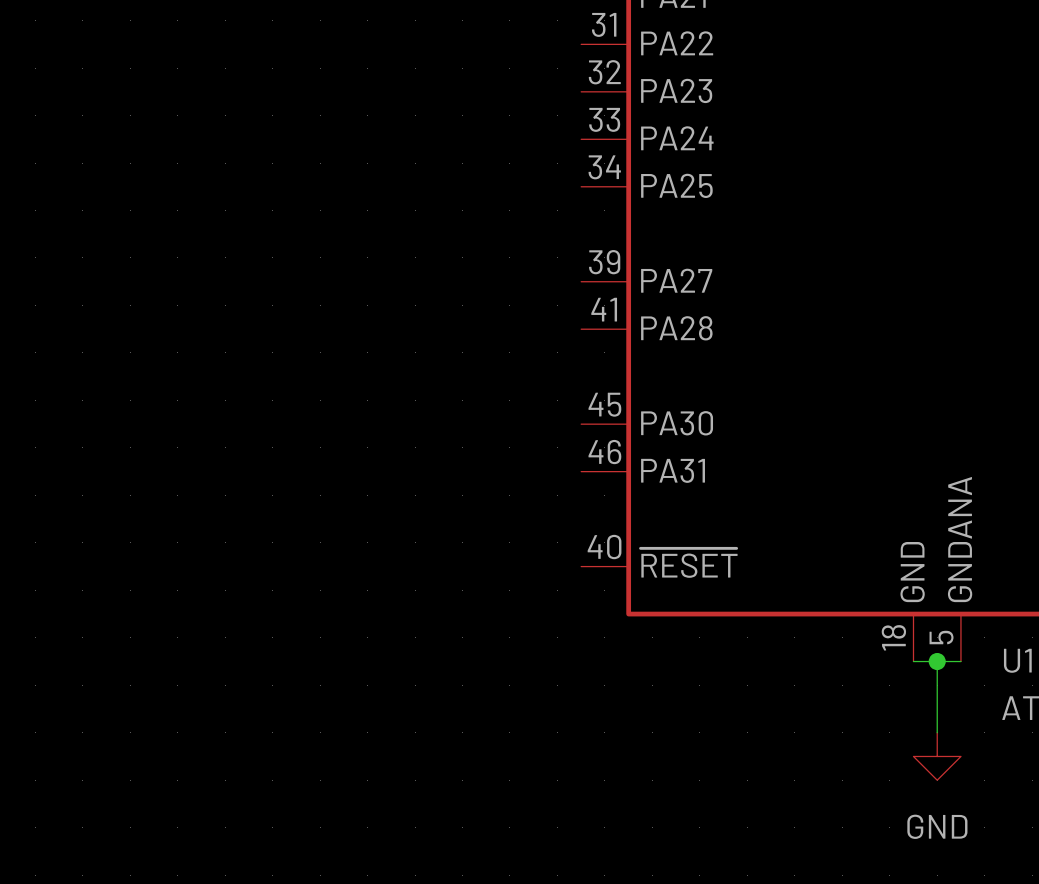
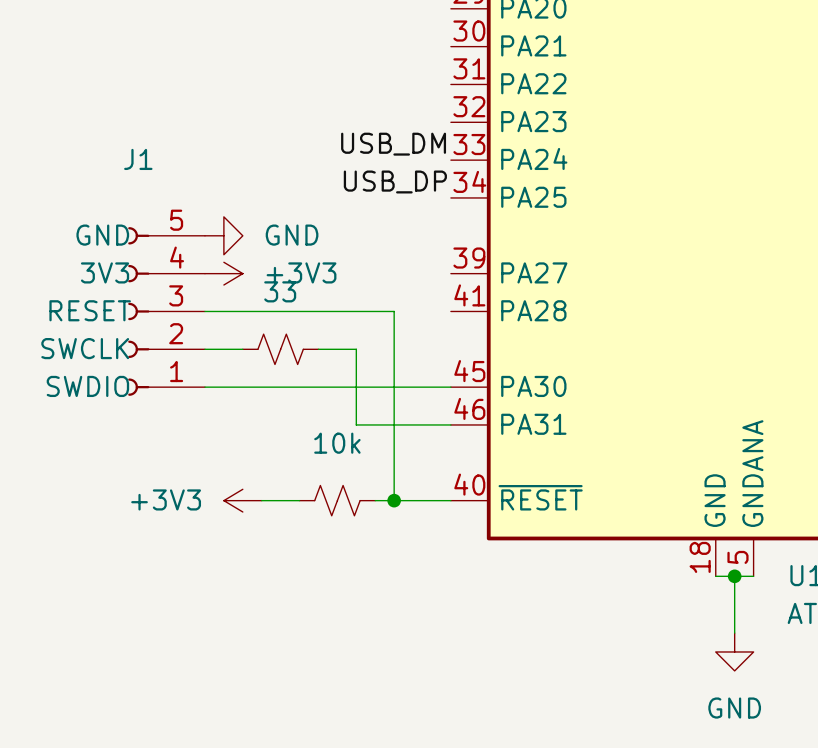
label: none -> USB_DM (393, 144)
label: none -> USB_DP (395, 181)
power symbol: none -> GND (223, 235)
power symbol: none -> +3V3 (223, 273)
J1: none -> (166, 311)
wire: none -> (204, 311) (394, 311) (394, 500)
wire: none -> (204, 349) (242, 349)
part: none -> 33 (280, 349)
wire: none -> (318, 349) (356, 349) (356, 424) (450, 424)
wire: none -> (204, 387) (450, 387)
power symbol: none -> +3V3 (242, 500)
wire: none -> (261, 500) (299, 500)
part: none -> 10k (337, 500)
wire: none -> (375, 500) (450, 500)
junction: none -> (394, 500)

